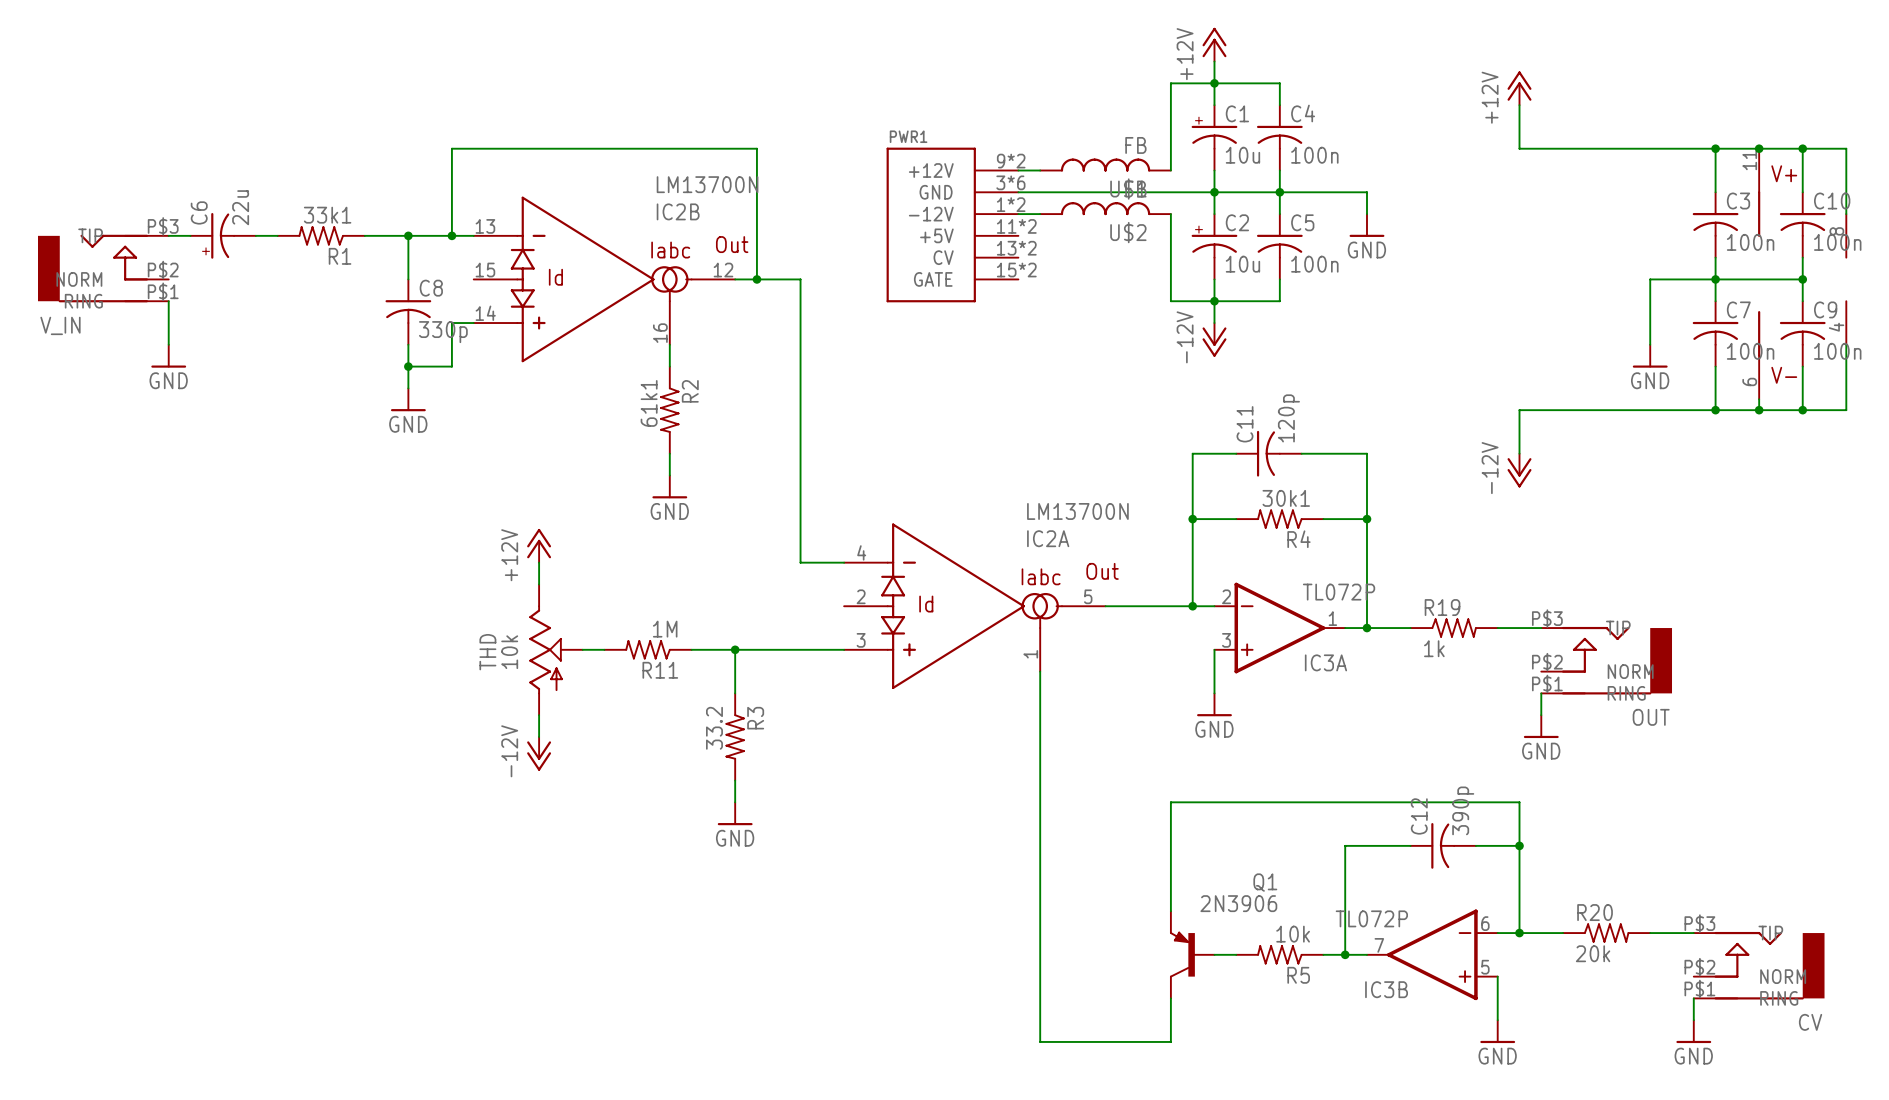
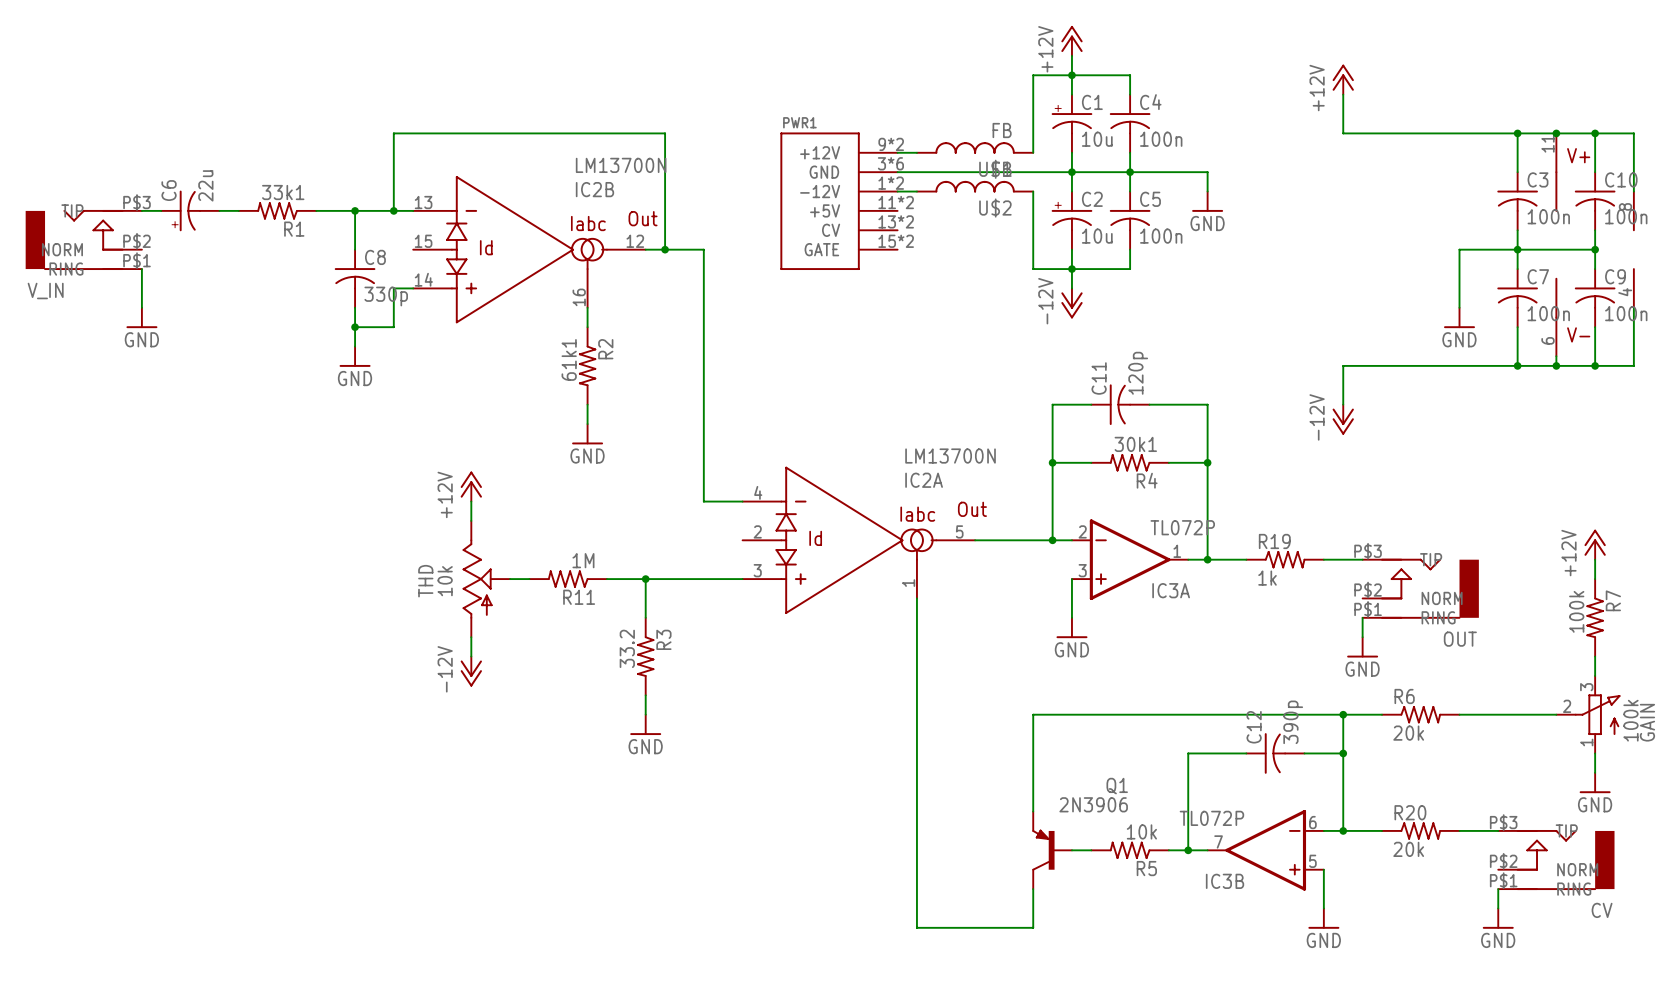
power symbol: none -> +12V (1595, 544)
wire: none -> (1595, 559) (1595, 579)
R7: none -> 100k (1595, 617)
wire: none -> (1595, 656) (1595, 675)
wire: none -> (1343, 714) (1382, 714)
junction: none -> (1343, 714)
R6: none -> 20k (1420, 714)
wire: none -> (1459, 714) (1556, 714)
GAIN: none -> 100k (1588, 714)
wire: none -> (1595, 753) (1595, 772)
power symbol: none -> GND (1595, 783)

